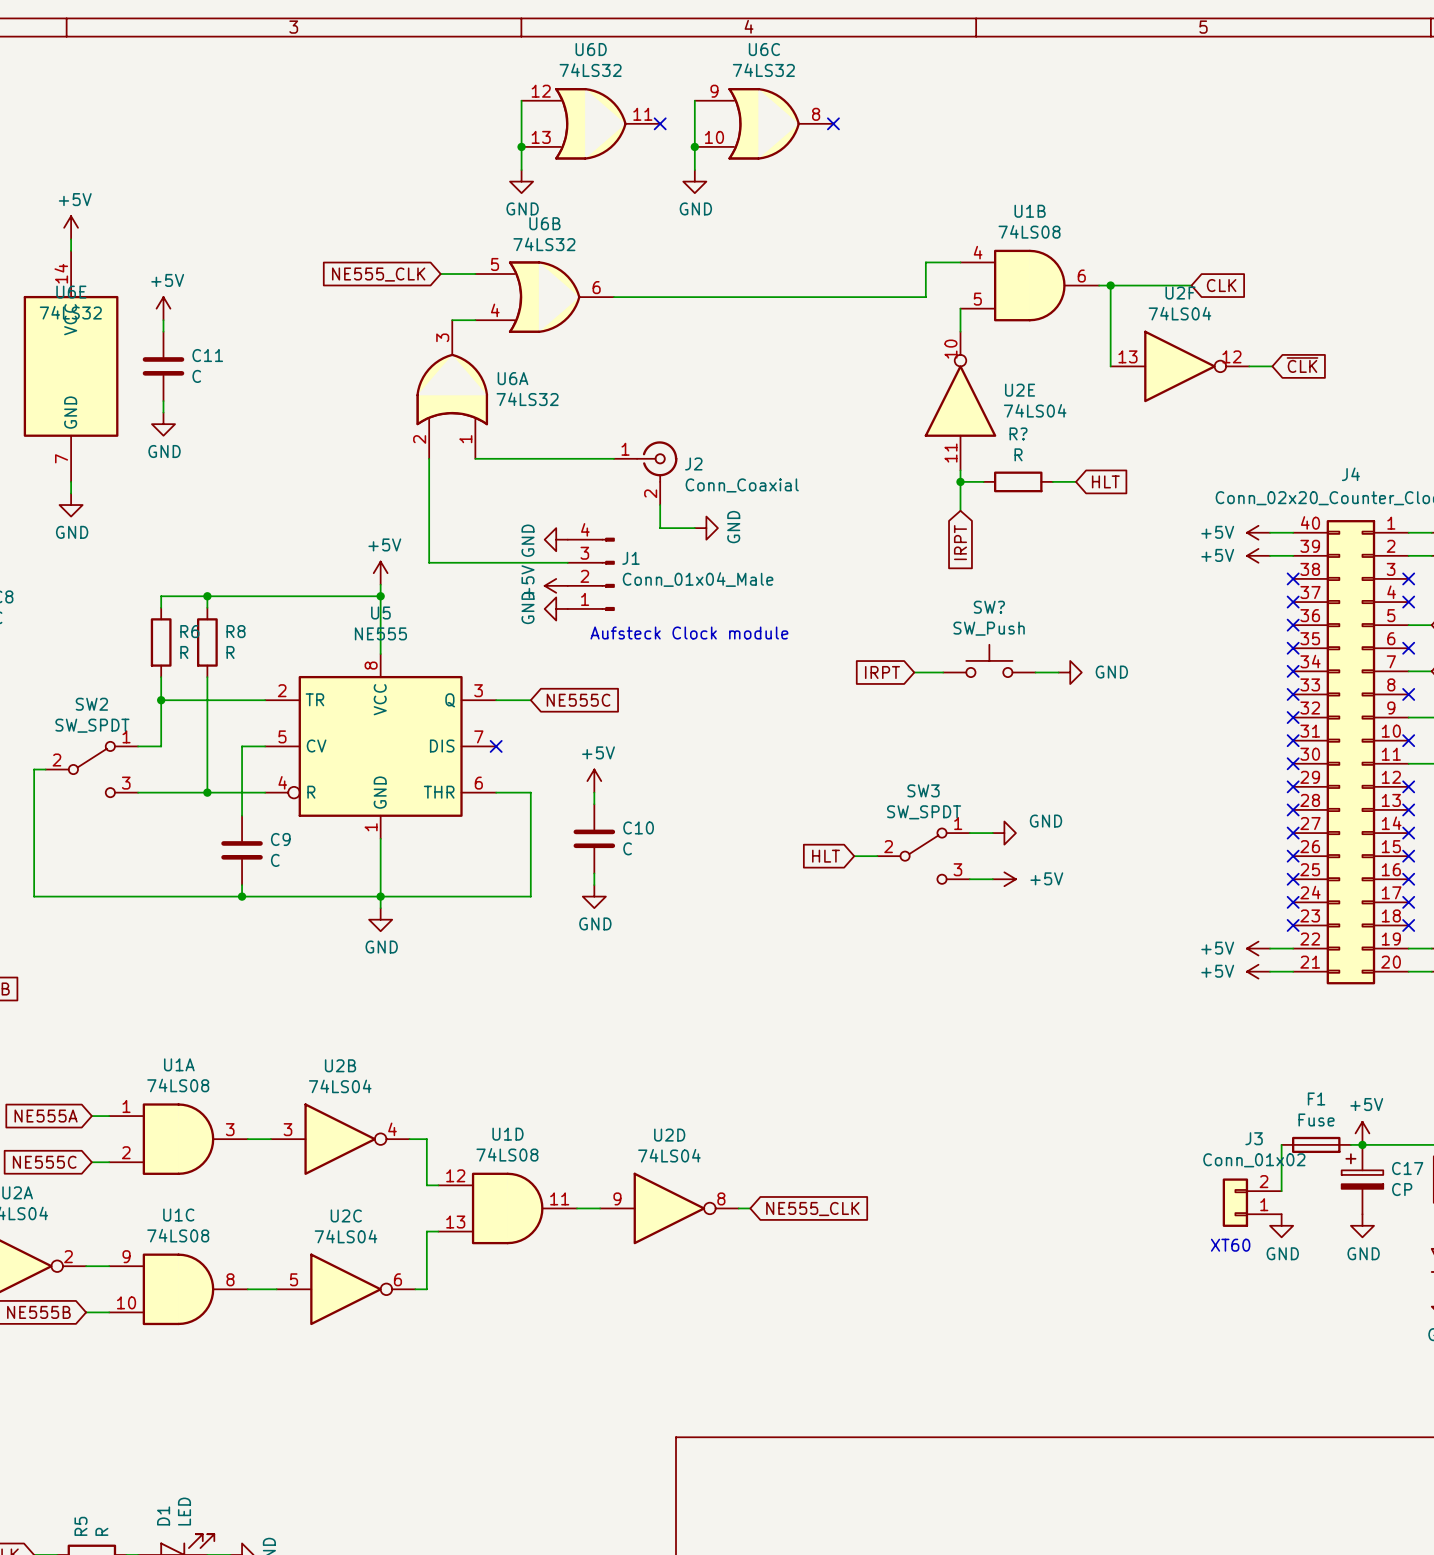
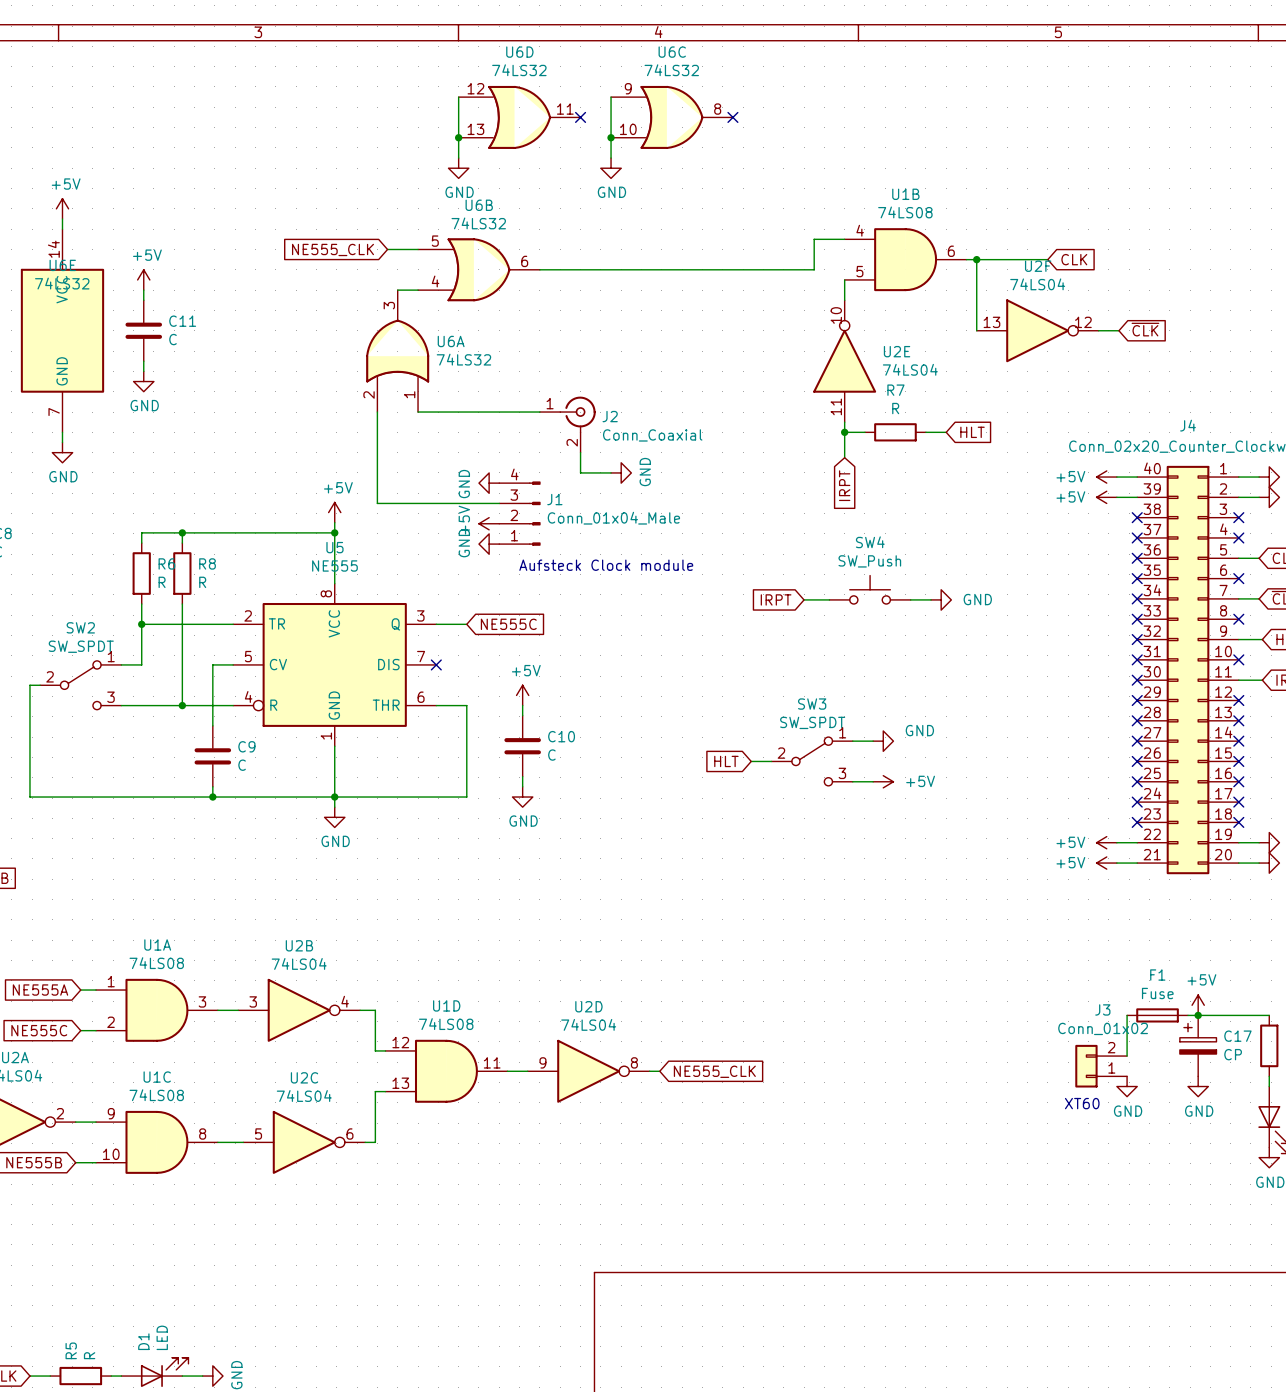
R? name: R? (1018, 433) -> R7 (895, 390)
SW? name: SW? (989, 607) -> SW4 (870, 542)

